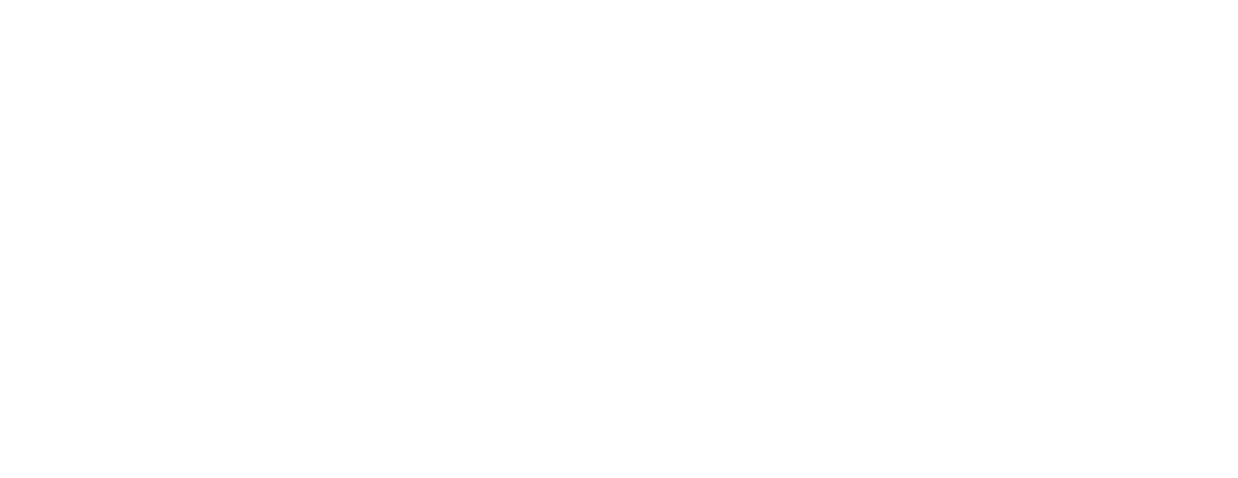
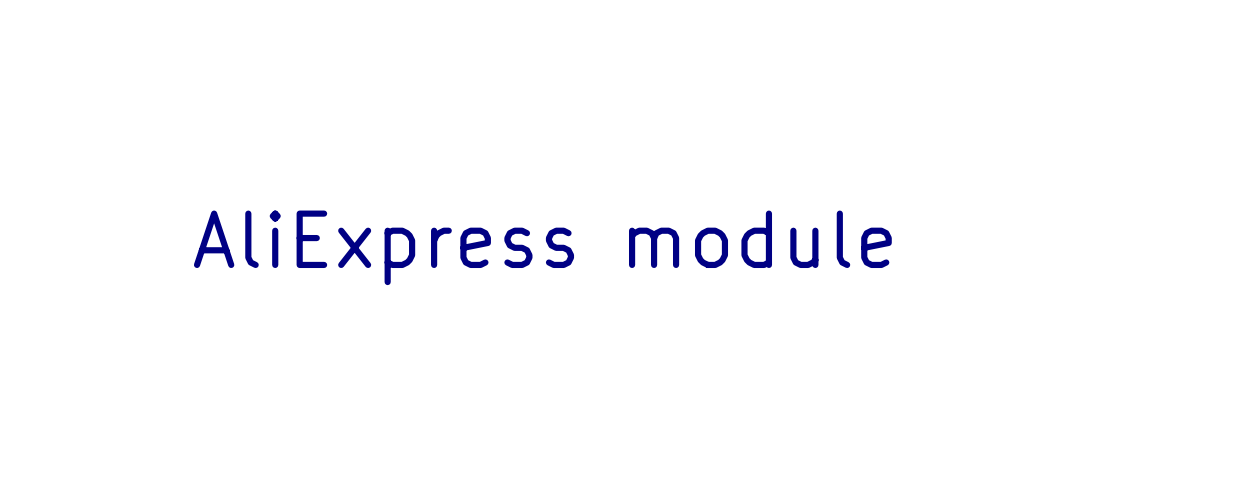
text: none -> AliExpress module (542, 247)

